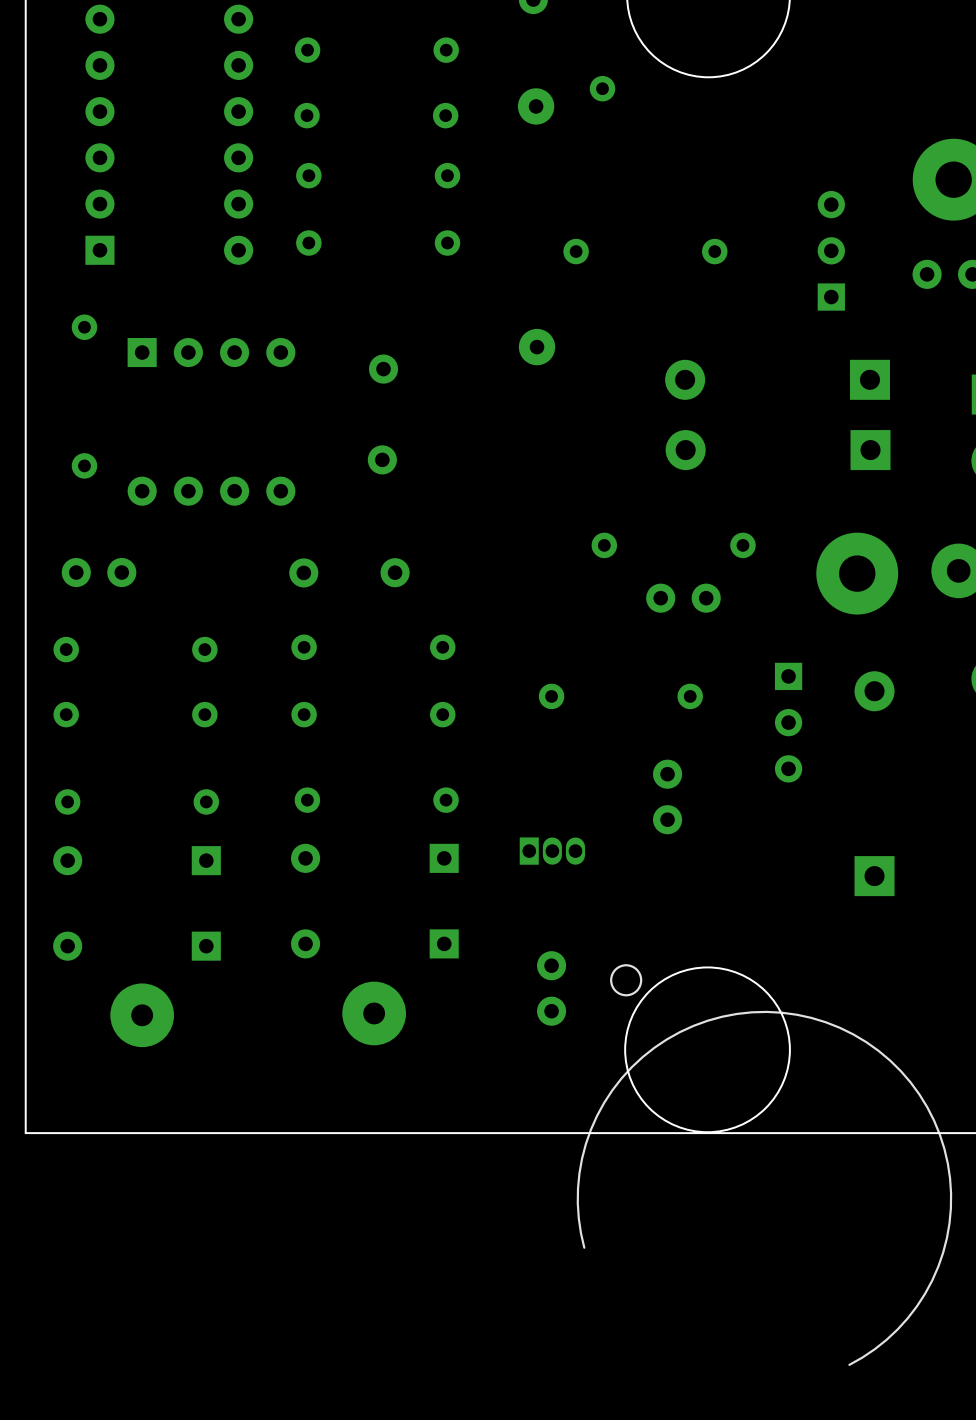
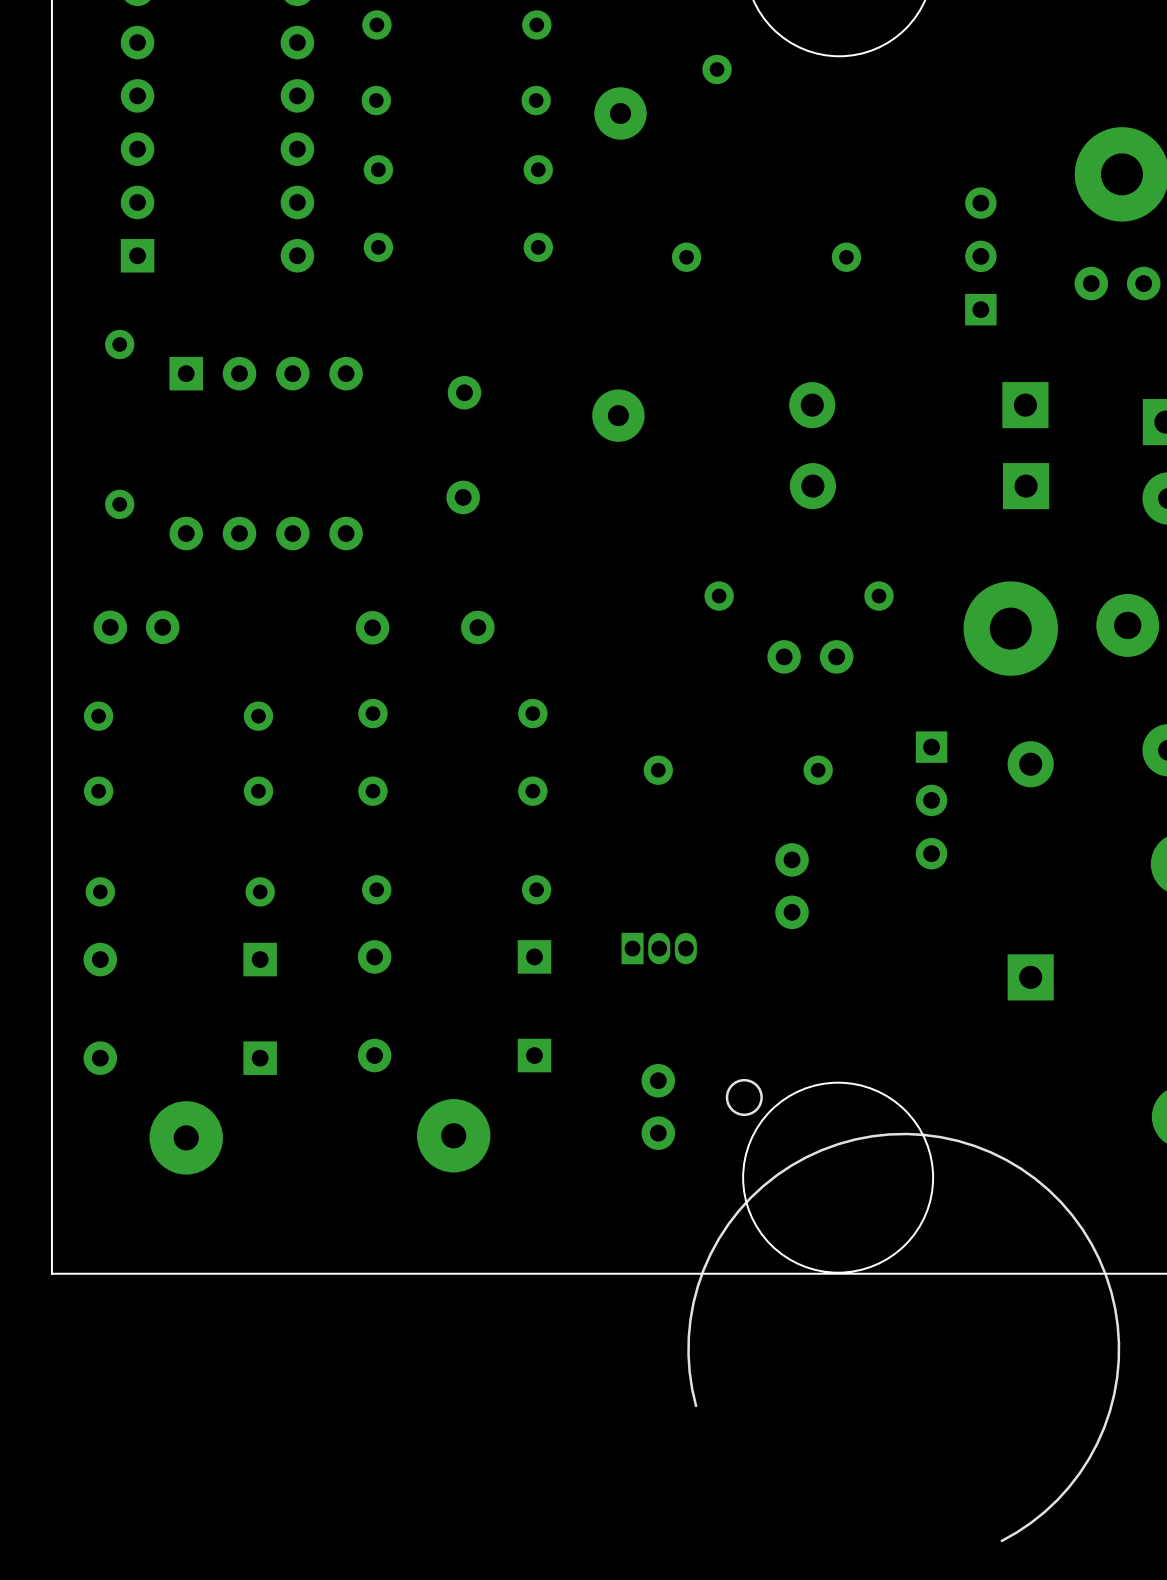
part: (536, 106) -> none
part: none -> (620, 113)
part: (537, 347) -> none
part: none -> (618, 415)

